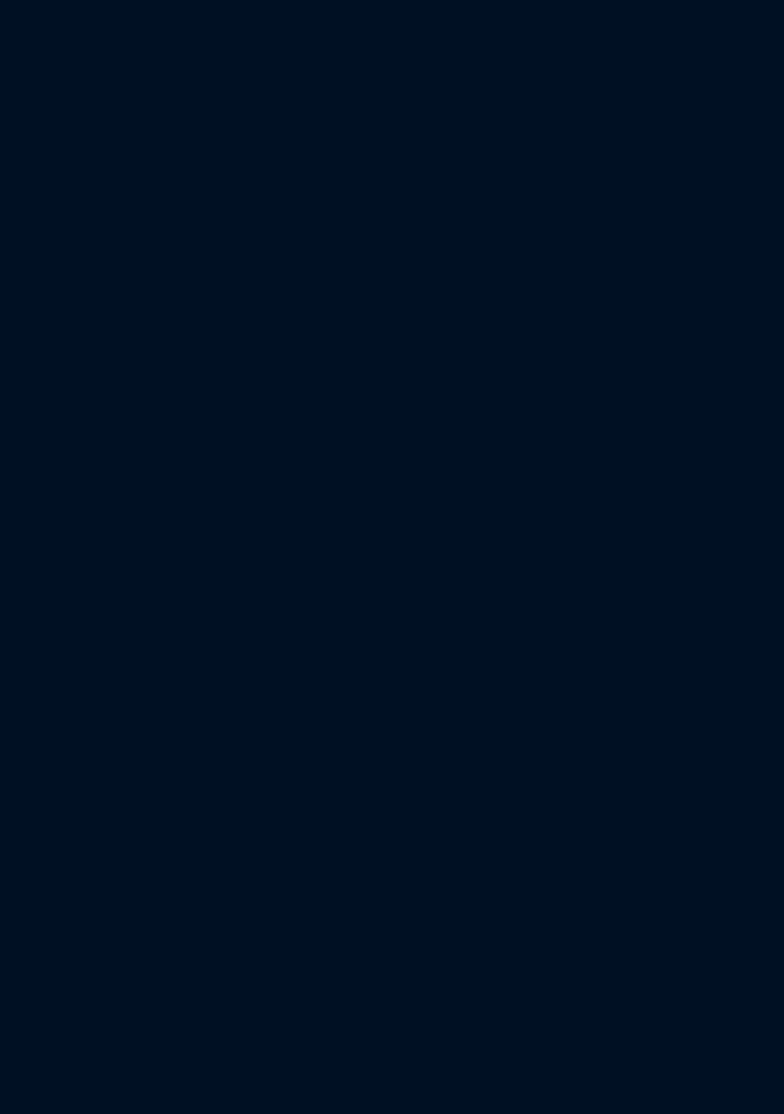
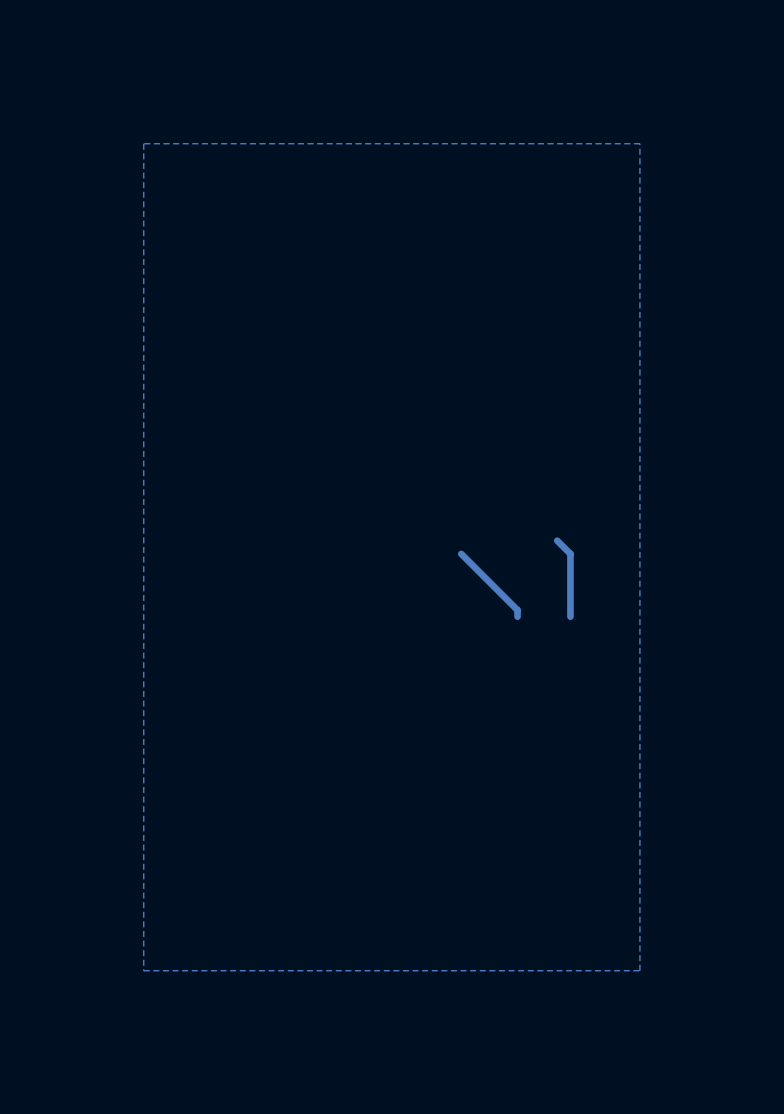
bottom zone outline: none -> (639, 143) (143, 143) (143, 970) (639, 970) (639, 143)
bottom track: none -> (557, 540) (570, 553) (570, 616)
bottom track: none -> (461, 553) (517, 610) (517, 616)

